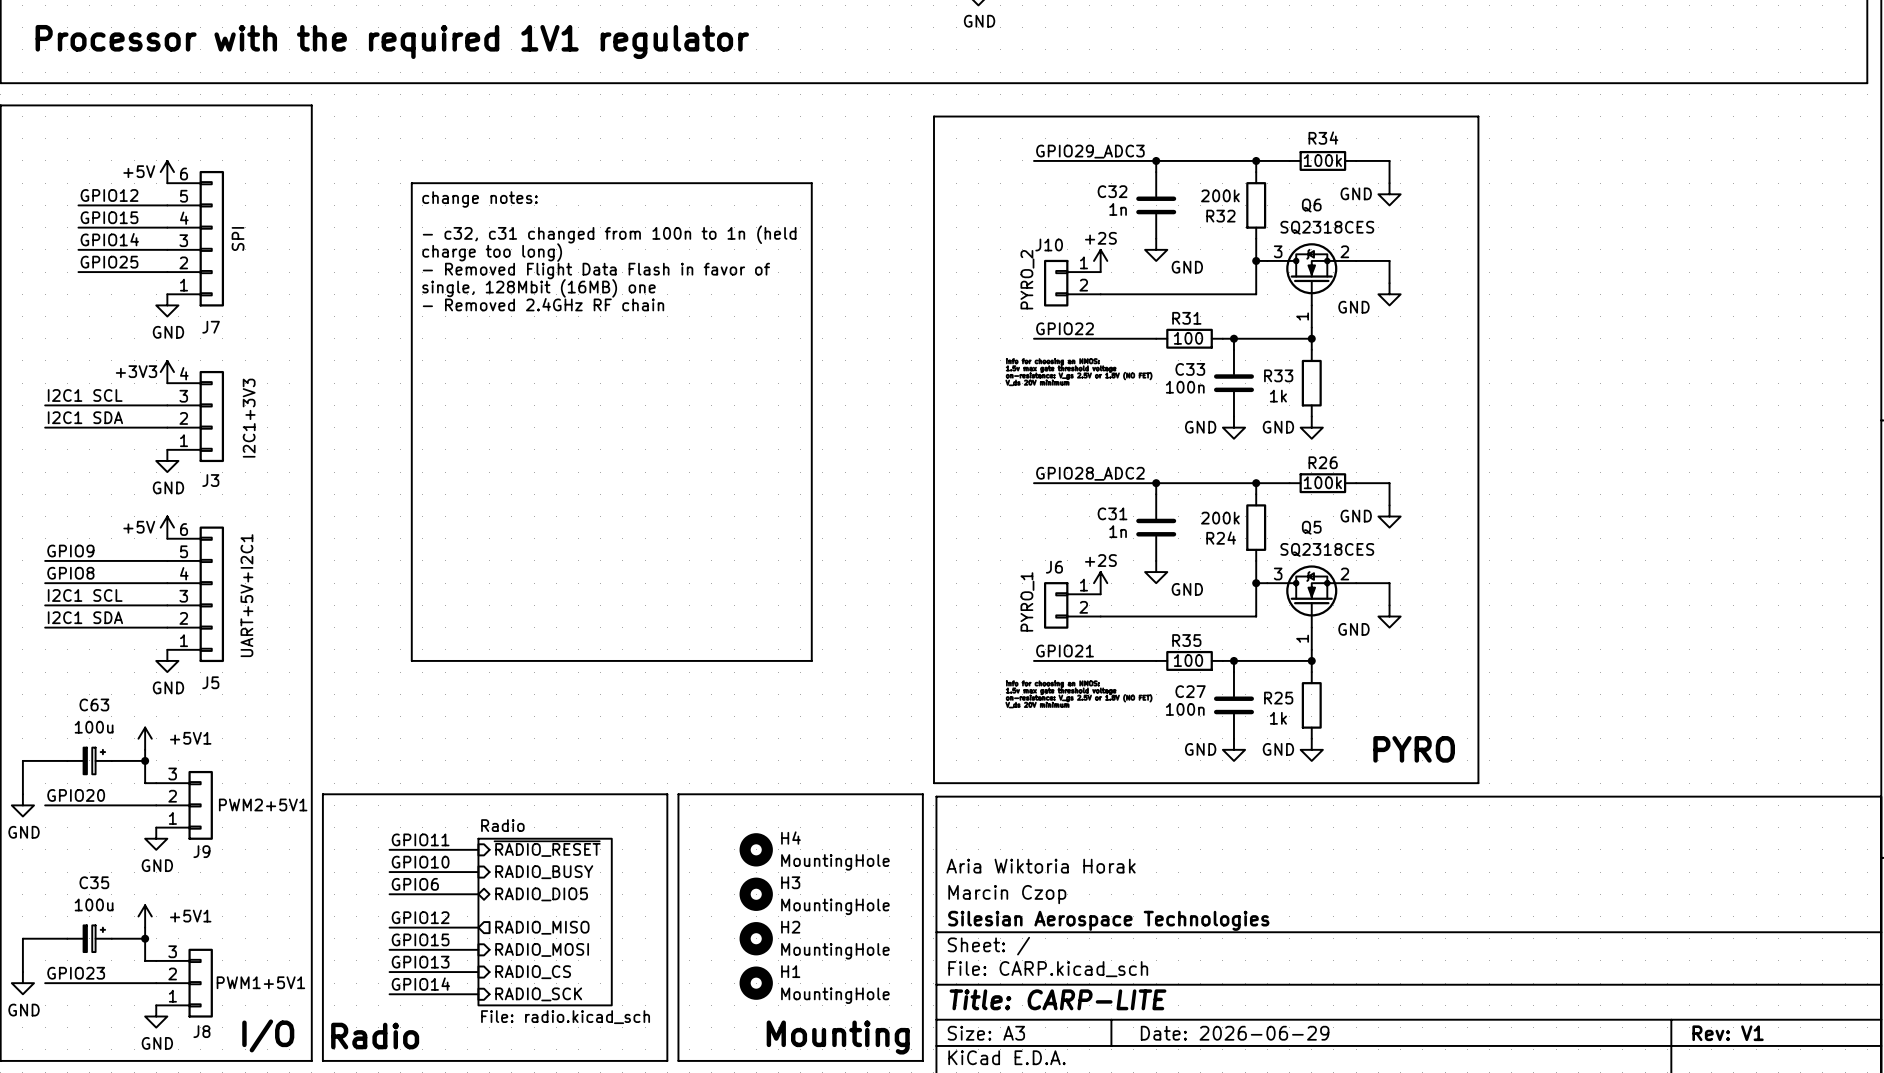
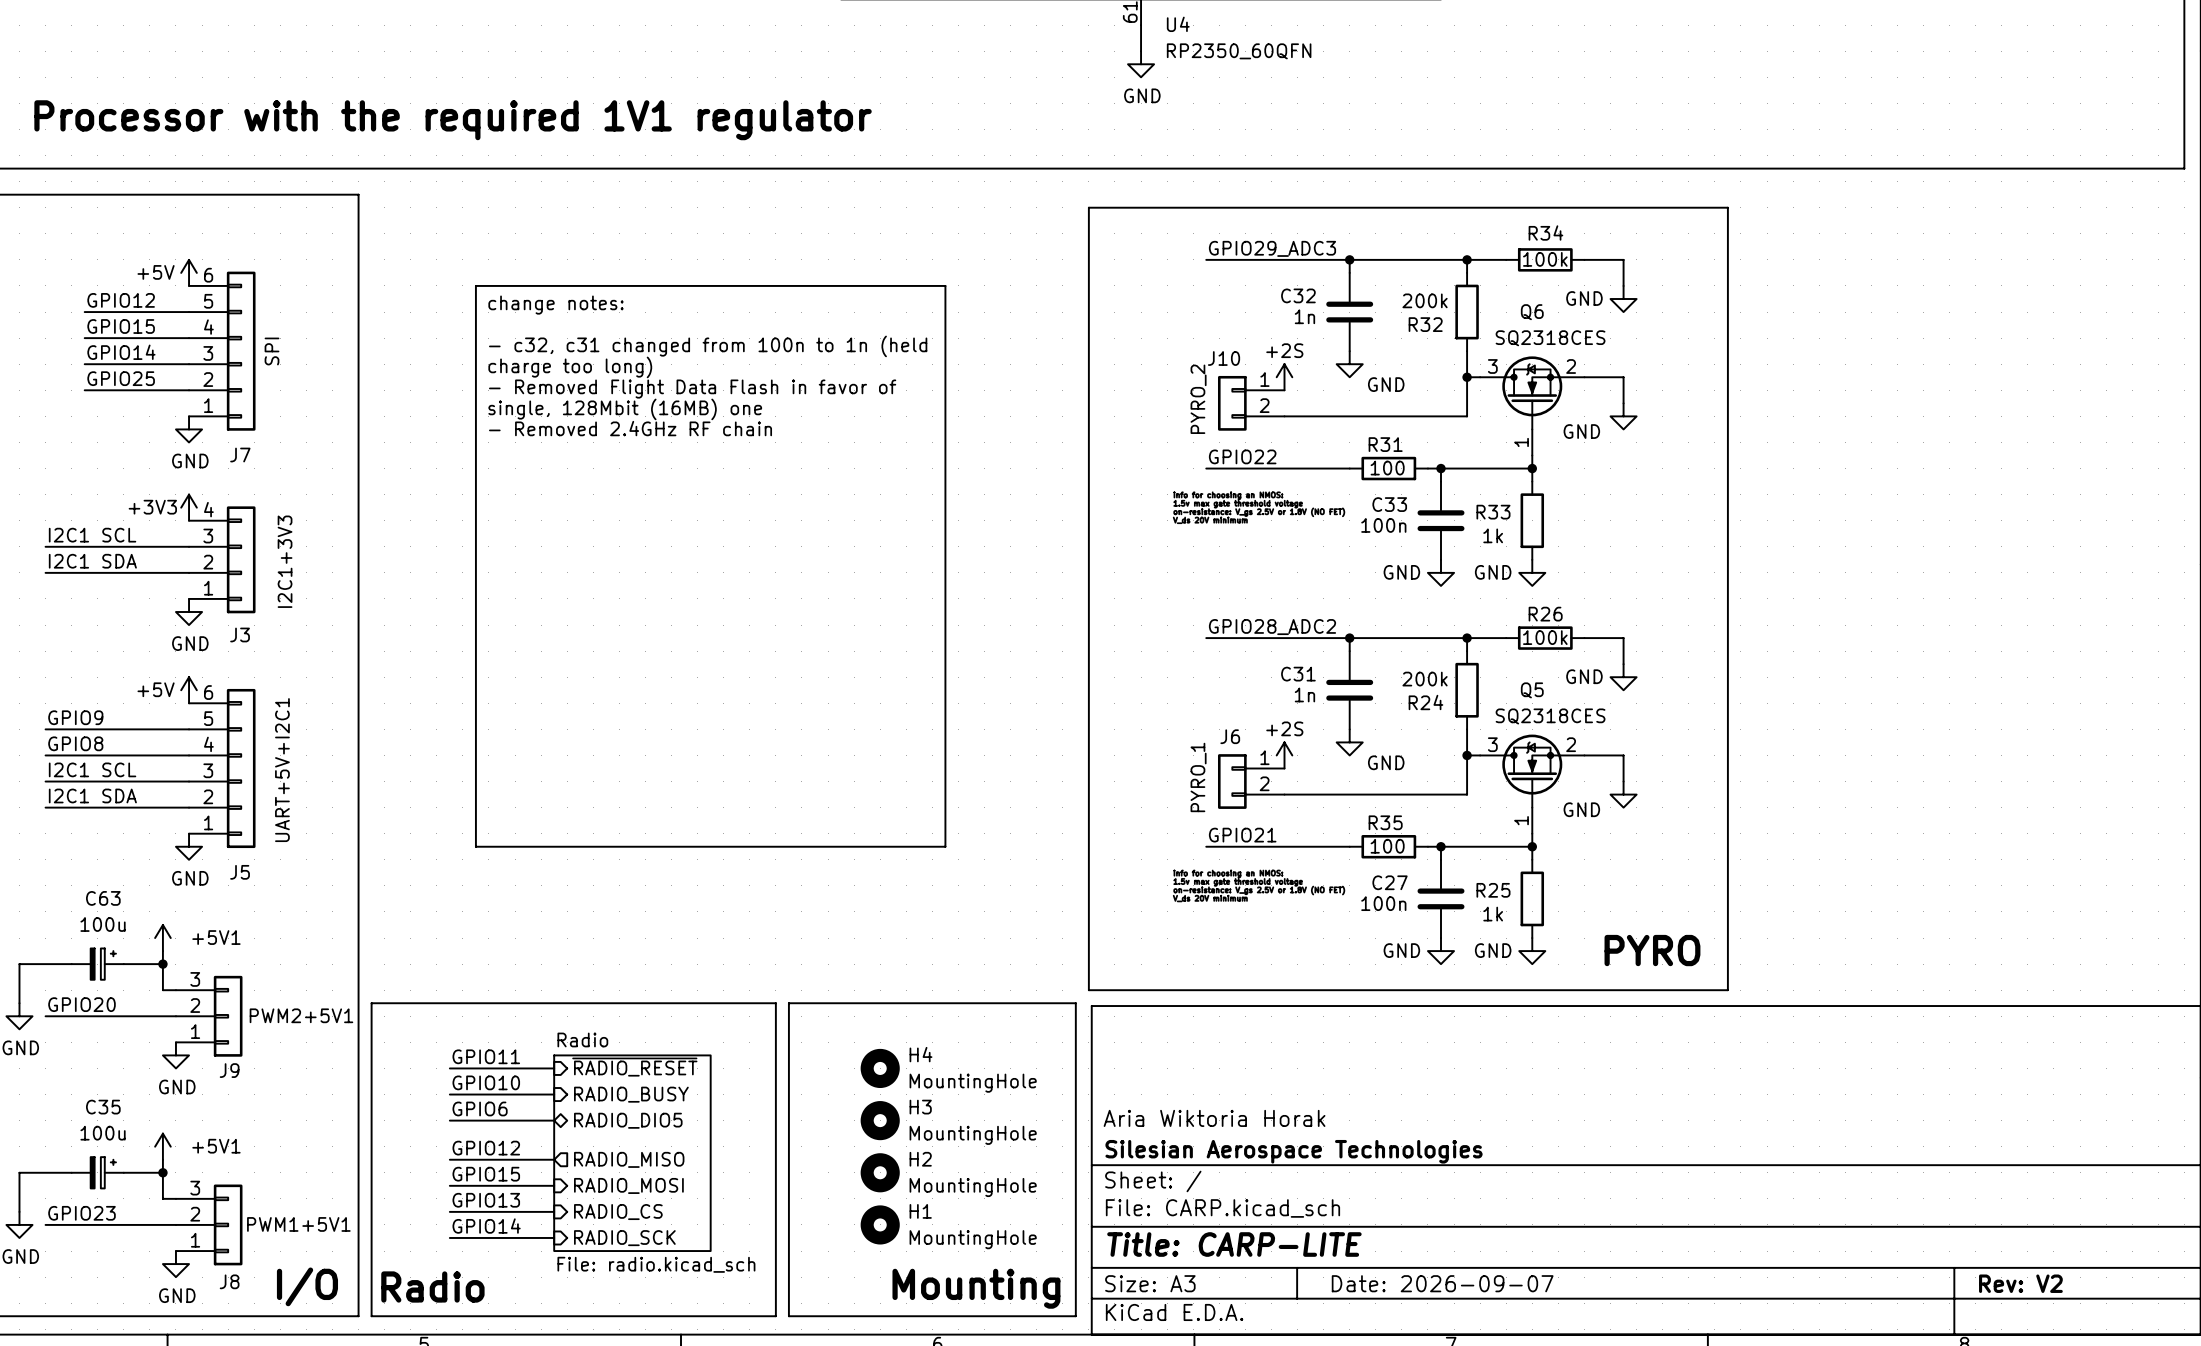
title block: Aria Wiktoria Horak (1041, 866) -> none
title block: Marcin Czop (1007, 894) -> Aria Wiktoria Horak (1214, 1118)
title block: Date: 2026-06-29 (1235, 1033) -> Date: 2026-09-07 (1442, 1283)
title block: Rev: V1 (1728, 1033) -> Rev: V2 (2020, 1283)

